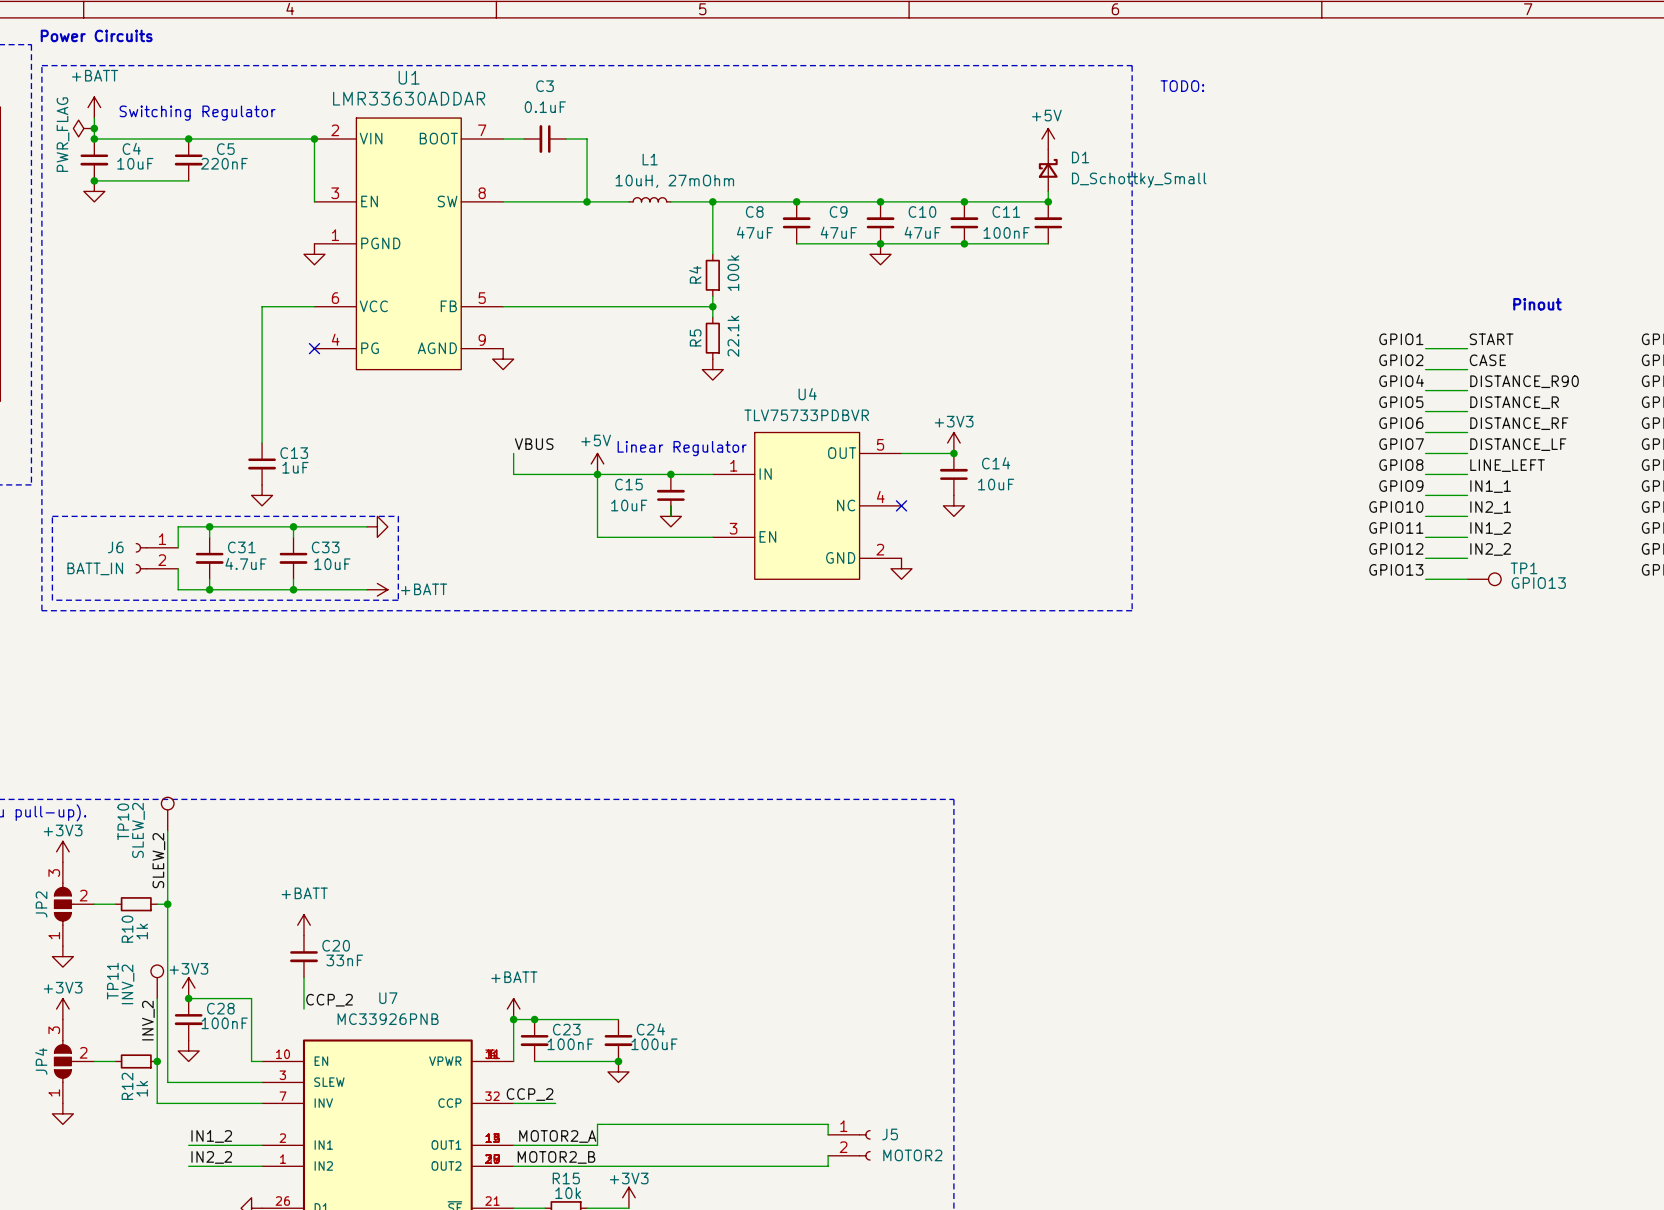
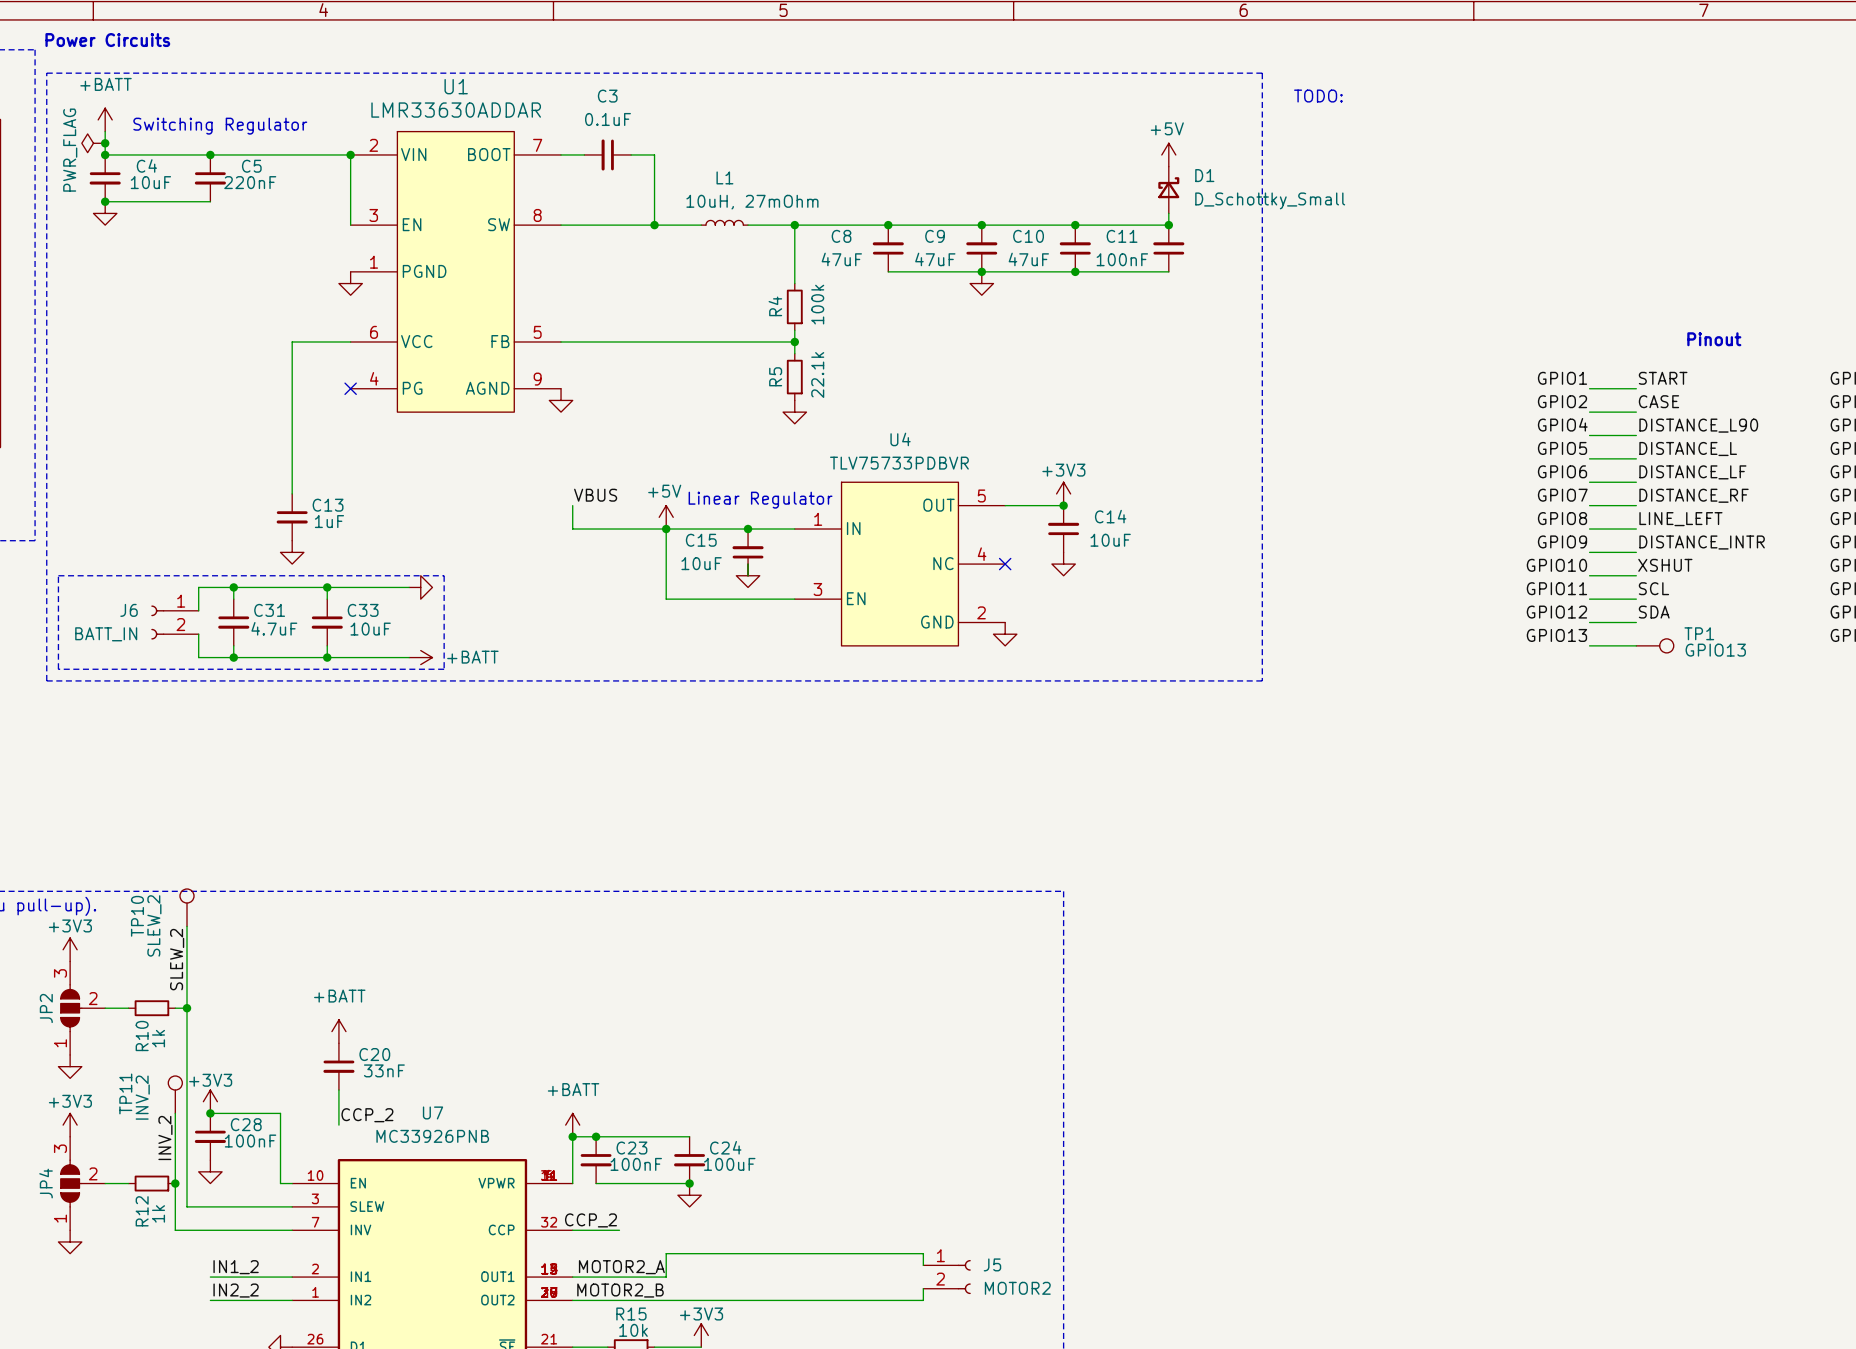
label: DISTANCE_R90 (1524, 381) -> DISTANCE_L90 (1698, 425)
label: DISTANCE_R (1514, 402) -> DISTANCE_L (1688, 449)
label: DISTANCE_RF (1519, 423) -> DISTANCE_LF (1692, 472)
label: DISTANCE_LF (1518, 444) -> DISTANCE_RF (1694, 495)
label: IN1_1 (1490, 486) -> DISTANCE_INTR (1702, 542)
label: IN2_1 (1490, 507) -> XSHUT (1665, 565)
label: IN1_2 (1490, 528) -> SCL (1653, 588)
label: IN2_2 (1490, 549) -> SDA (1654, 612)

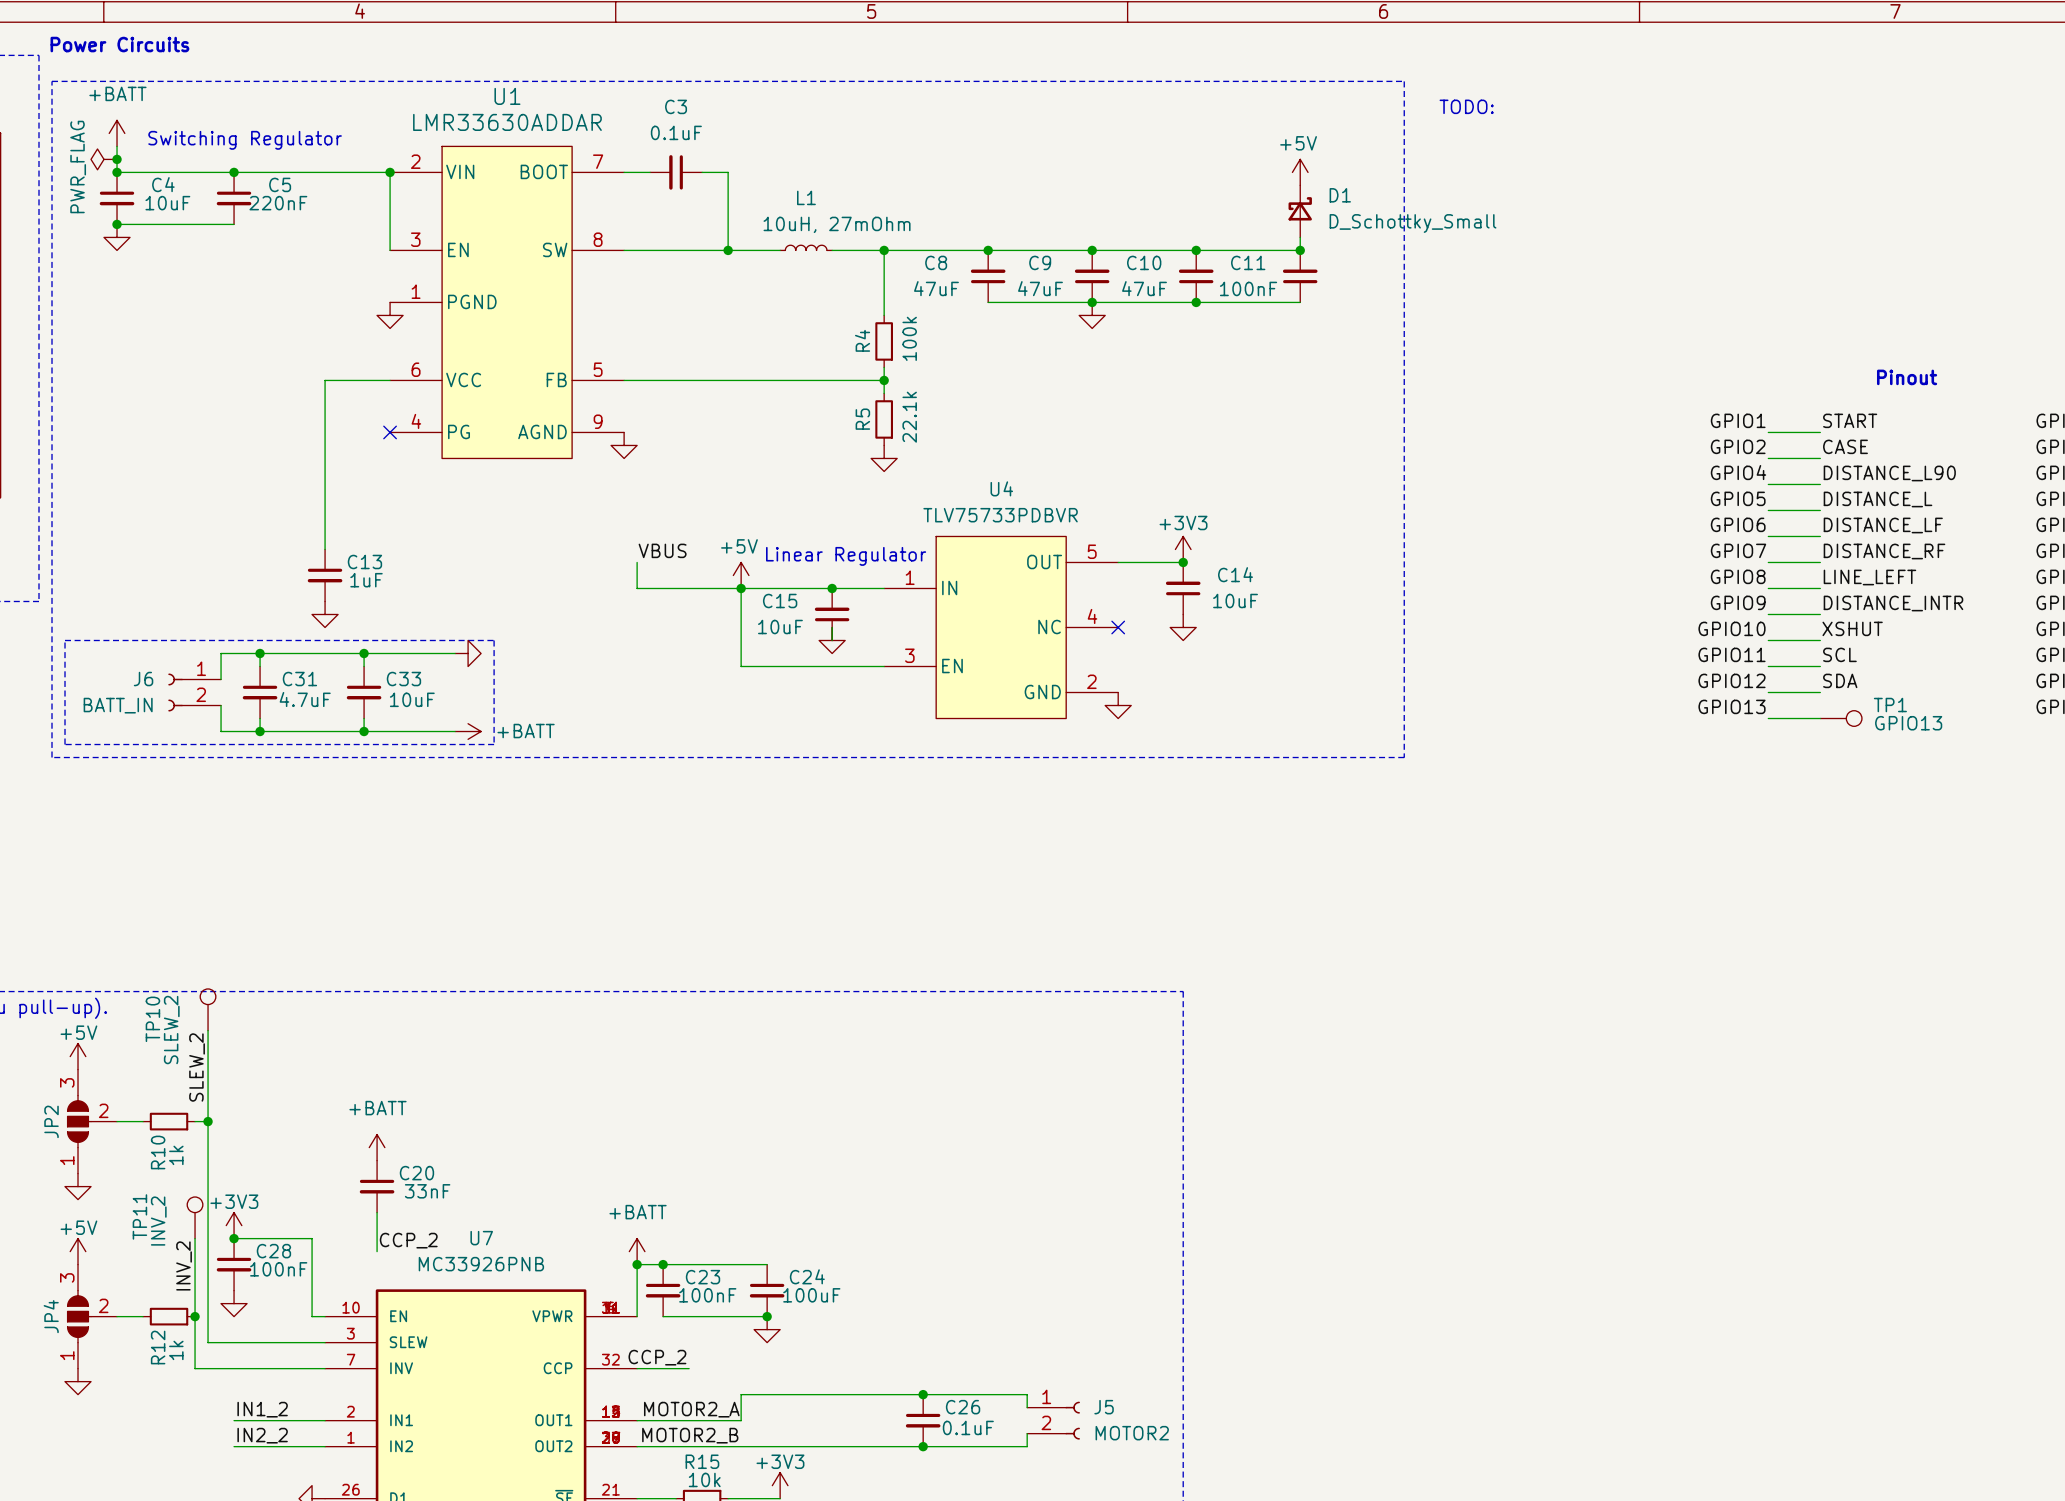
power symbol: +3V3 (70, 949) -> +5V (78, 1056)
power symbol: +3V3 (70, 1125) -> +5V (78, 1251)
junction: none -> (923, 1394)
C26: none -> 0.1uF (923, 1420)
junction: none -> (923, 1446)

